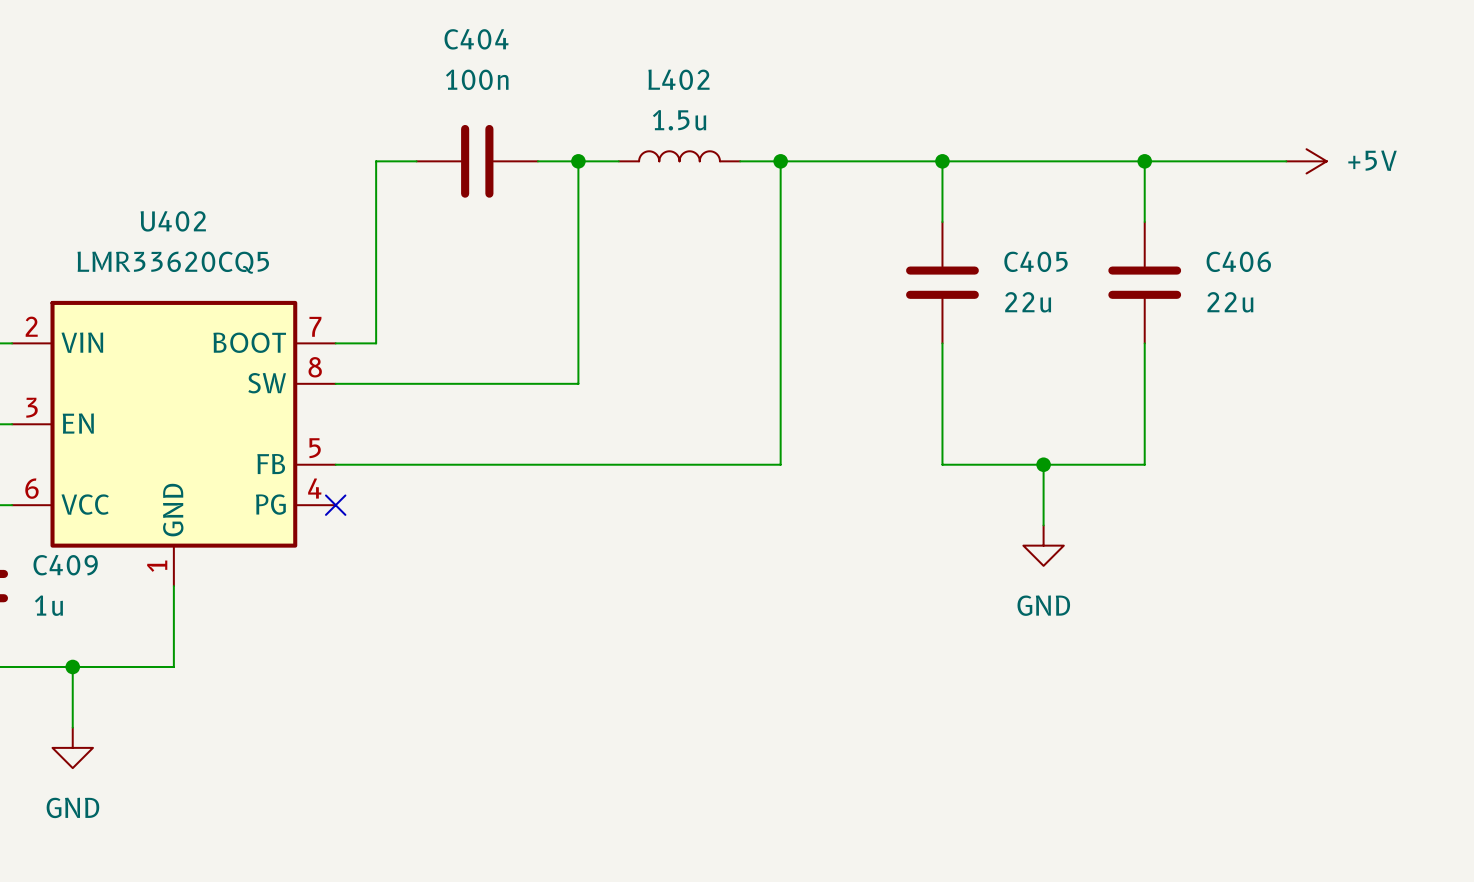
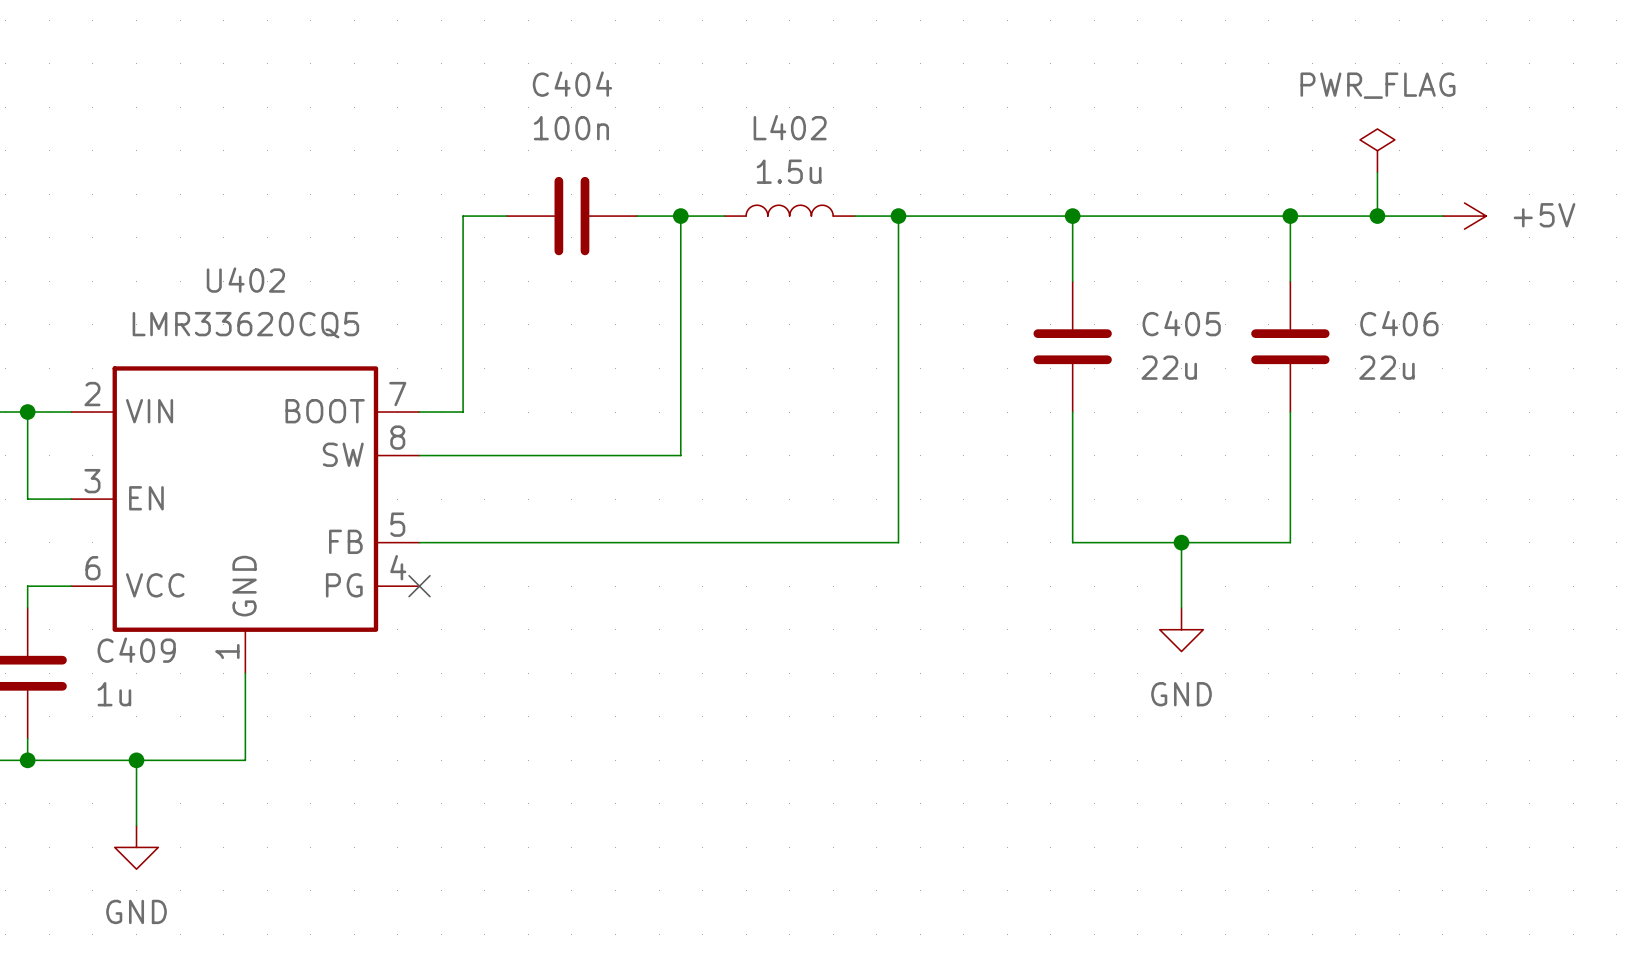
power symbol: none -> PWR_FLAG (1377, 150)
wire: none -> (1377, 172) (1377, 216)
junction: none -> (1377, 216)

